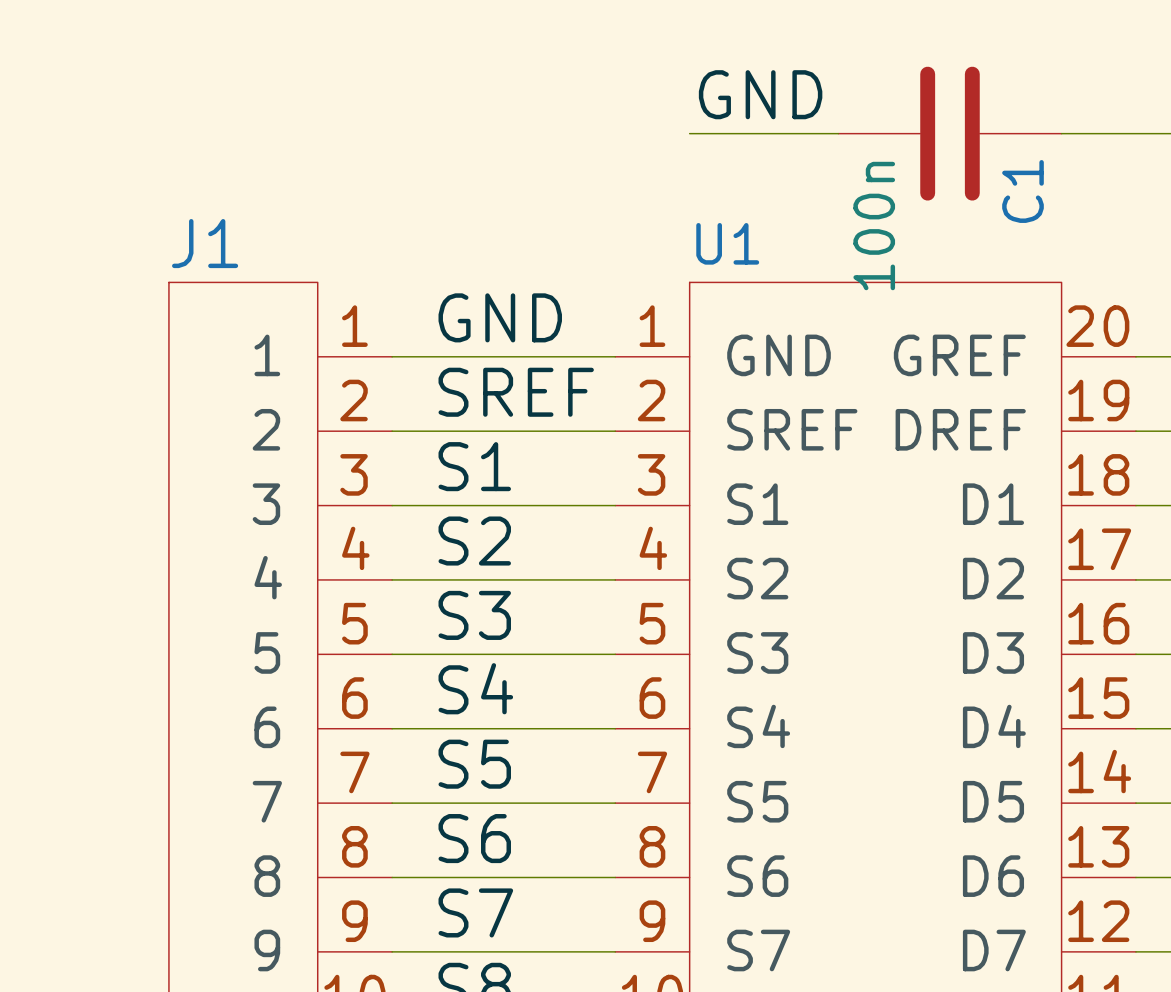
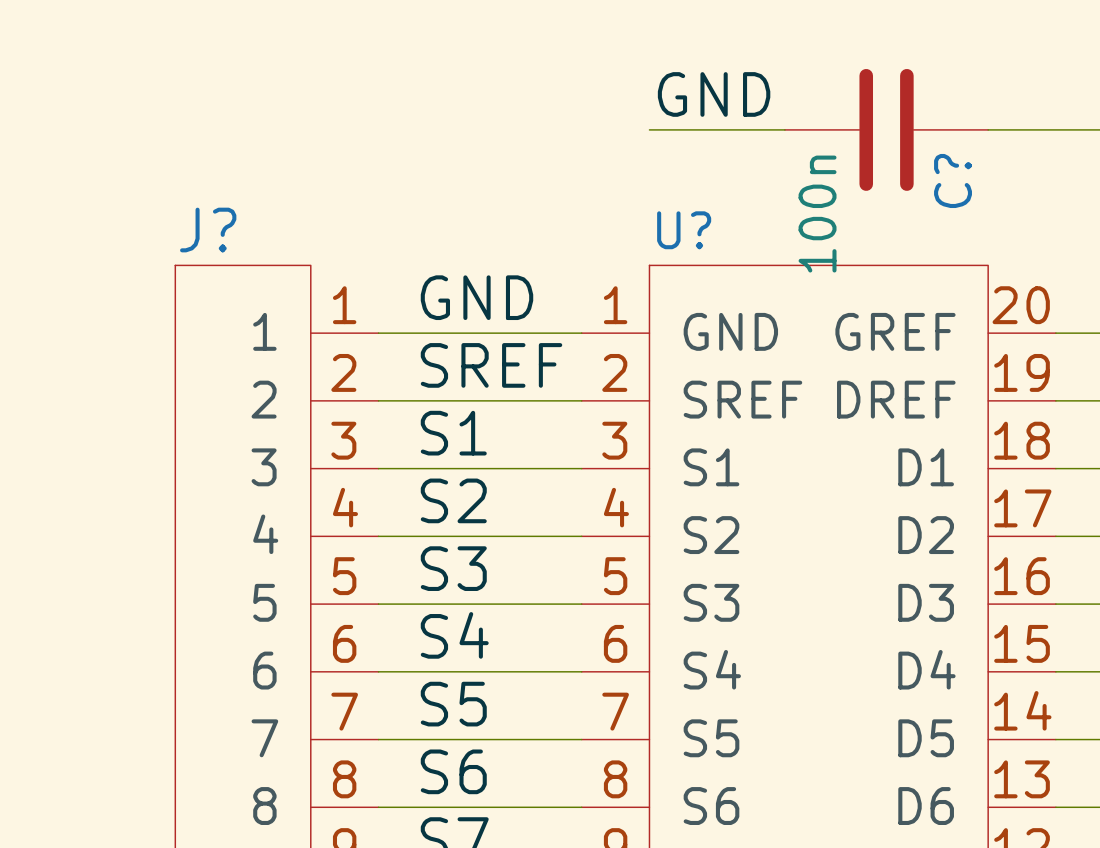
C1 name: C1 (1022, 191) -> C? (953, 180)
J1 name: J1 (205, 243) -> J? (208, 230)
U1 name: U1 (727, 243) -> U? (684, 230)

